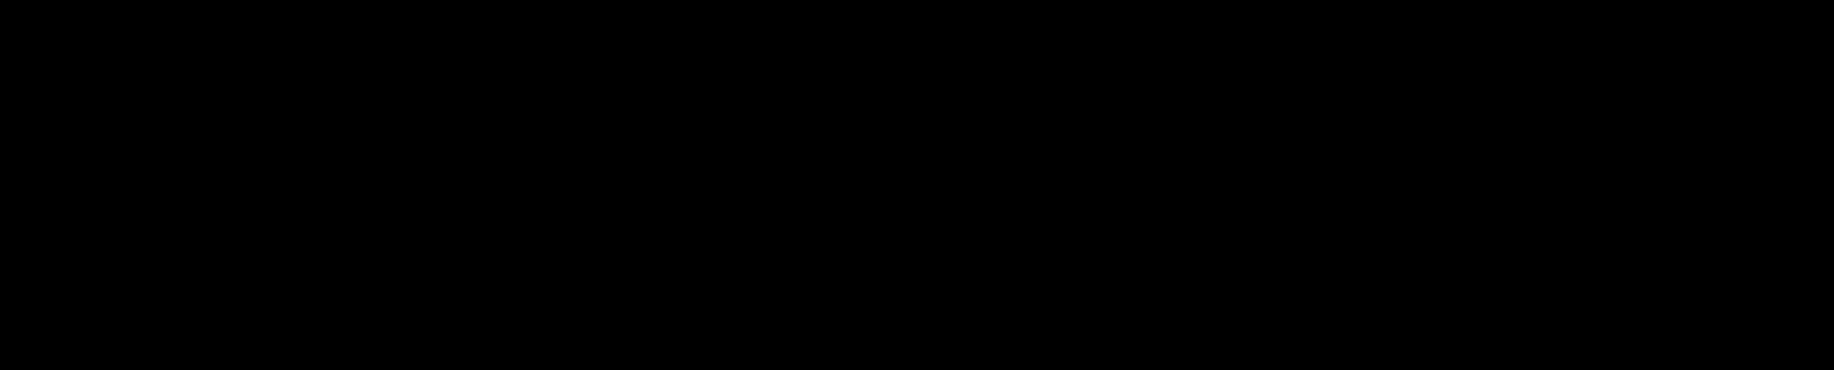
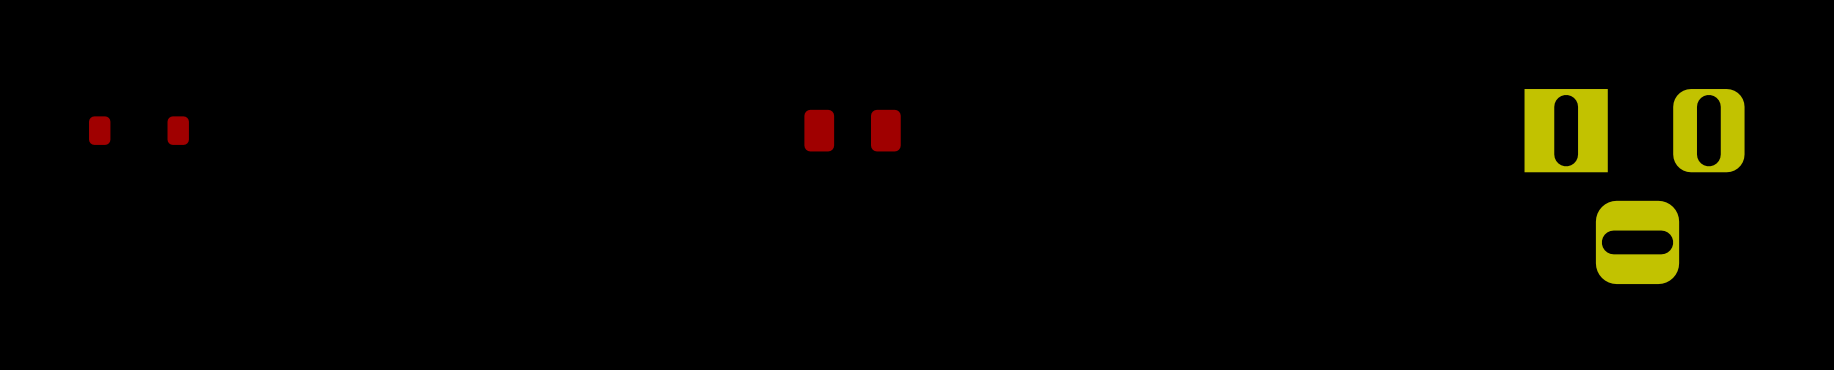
part: none -> (138, 130)
part: none -> (852, 130)
part: none -> (1634, 186)

